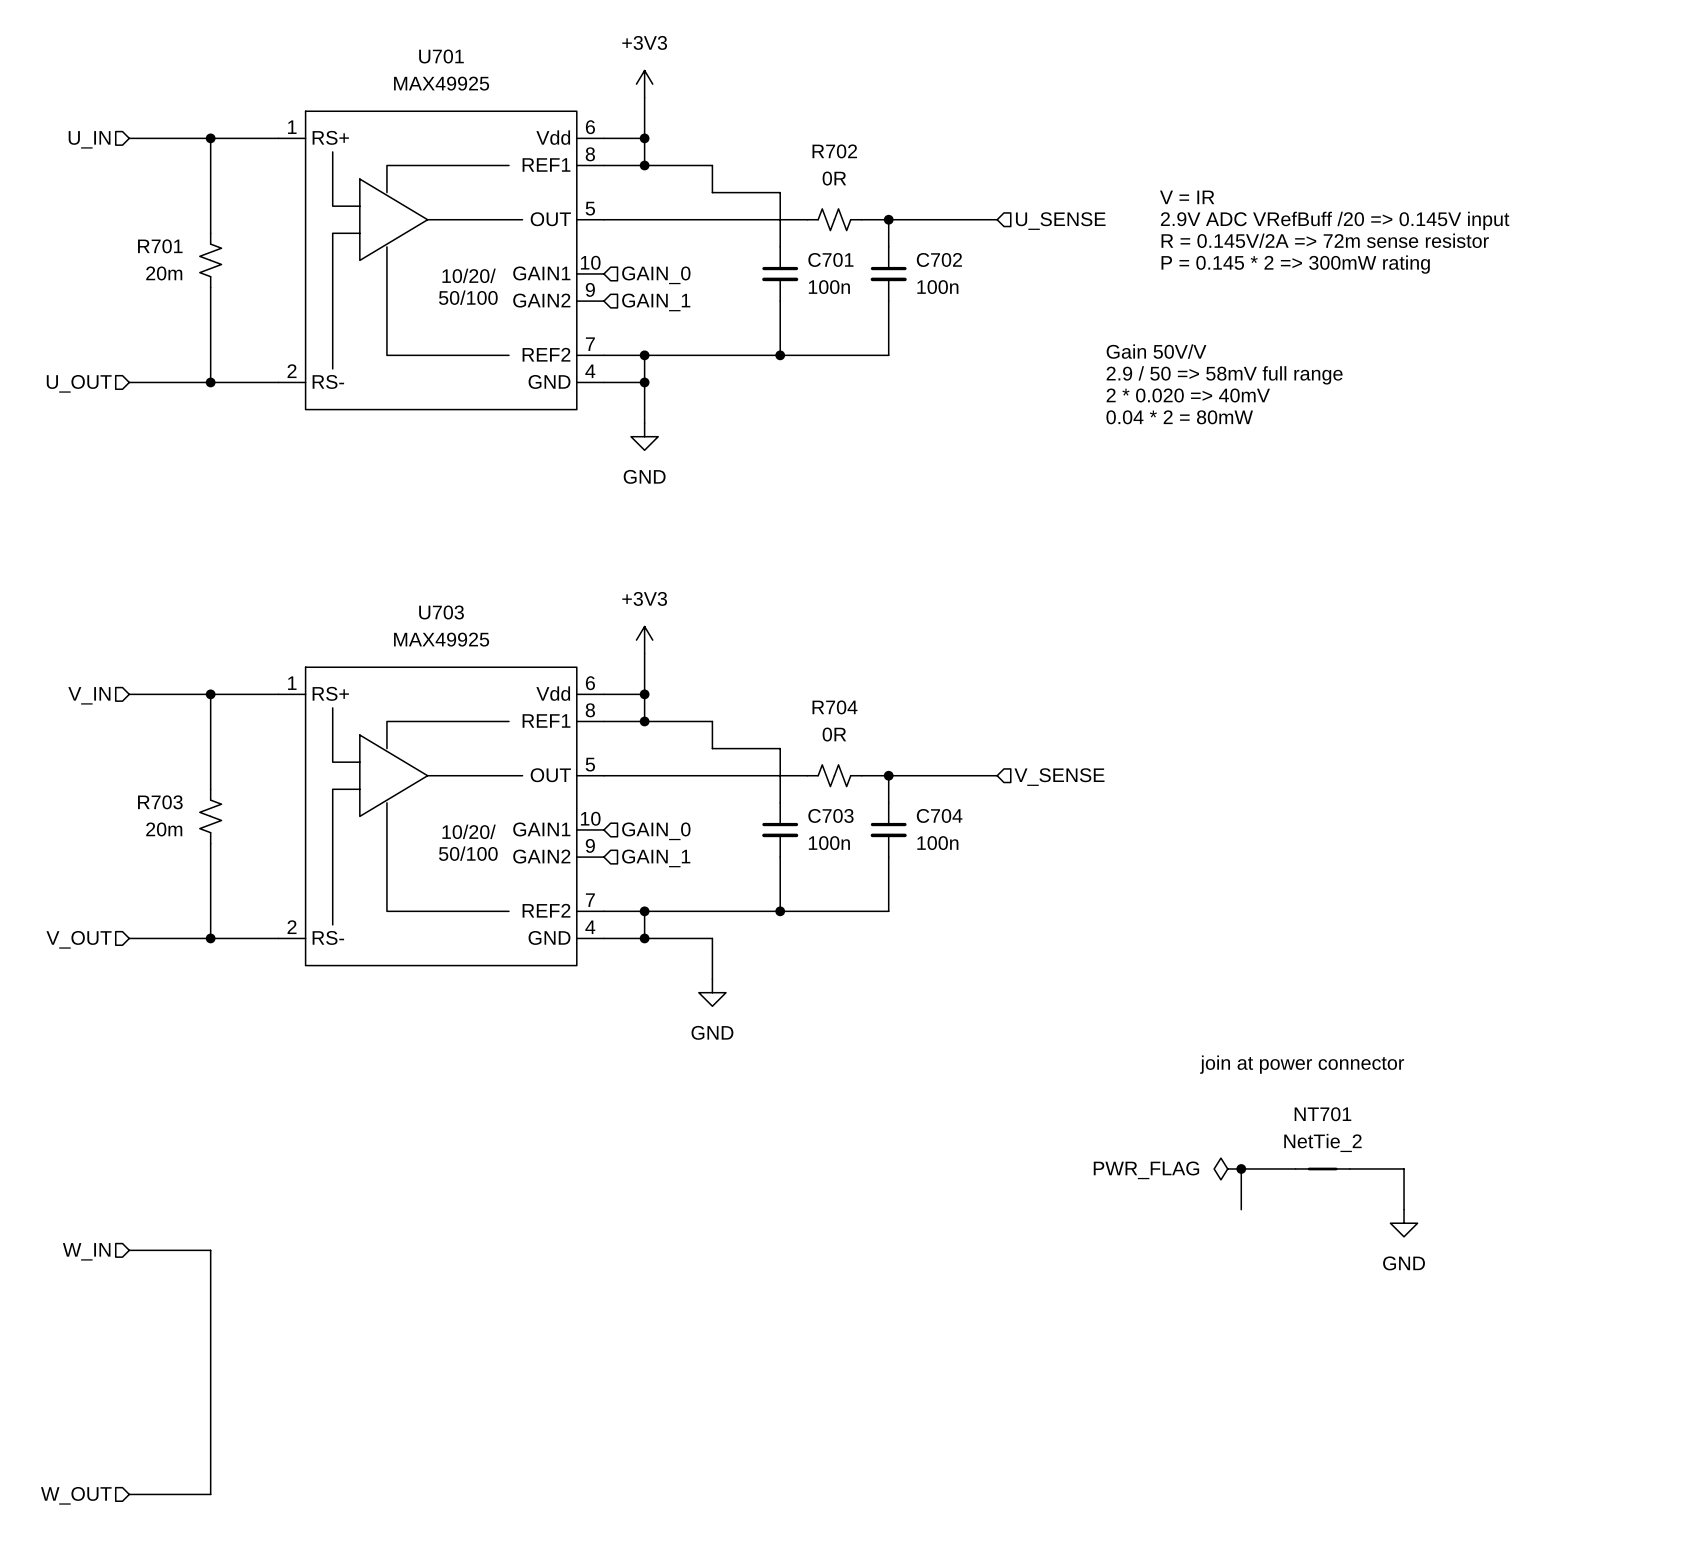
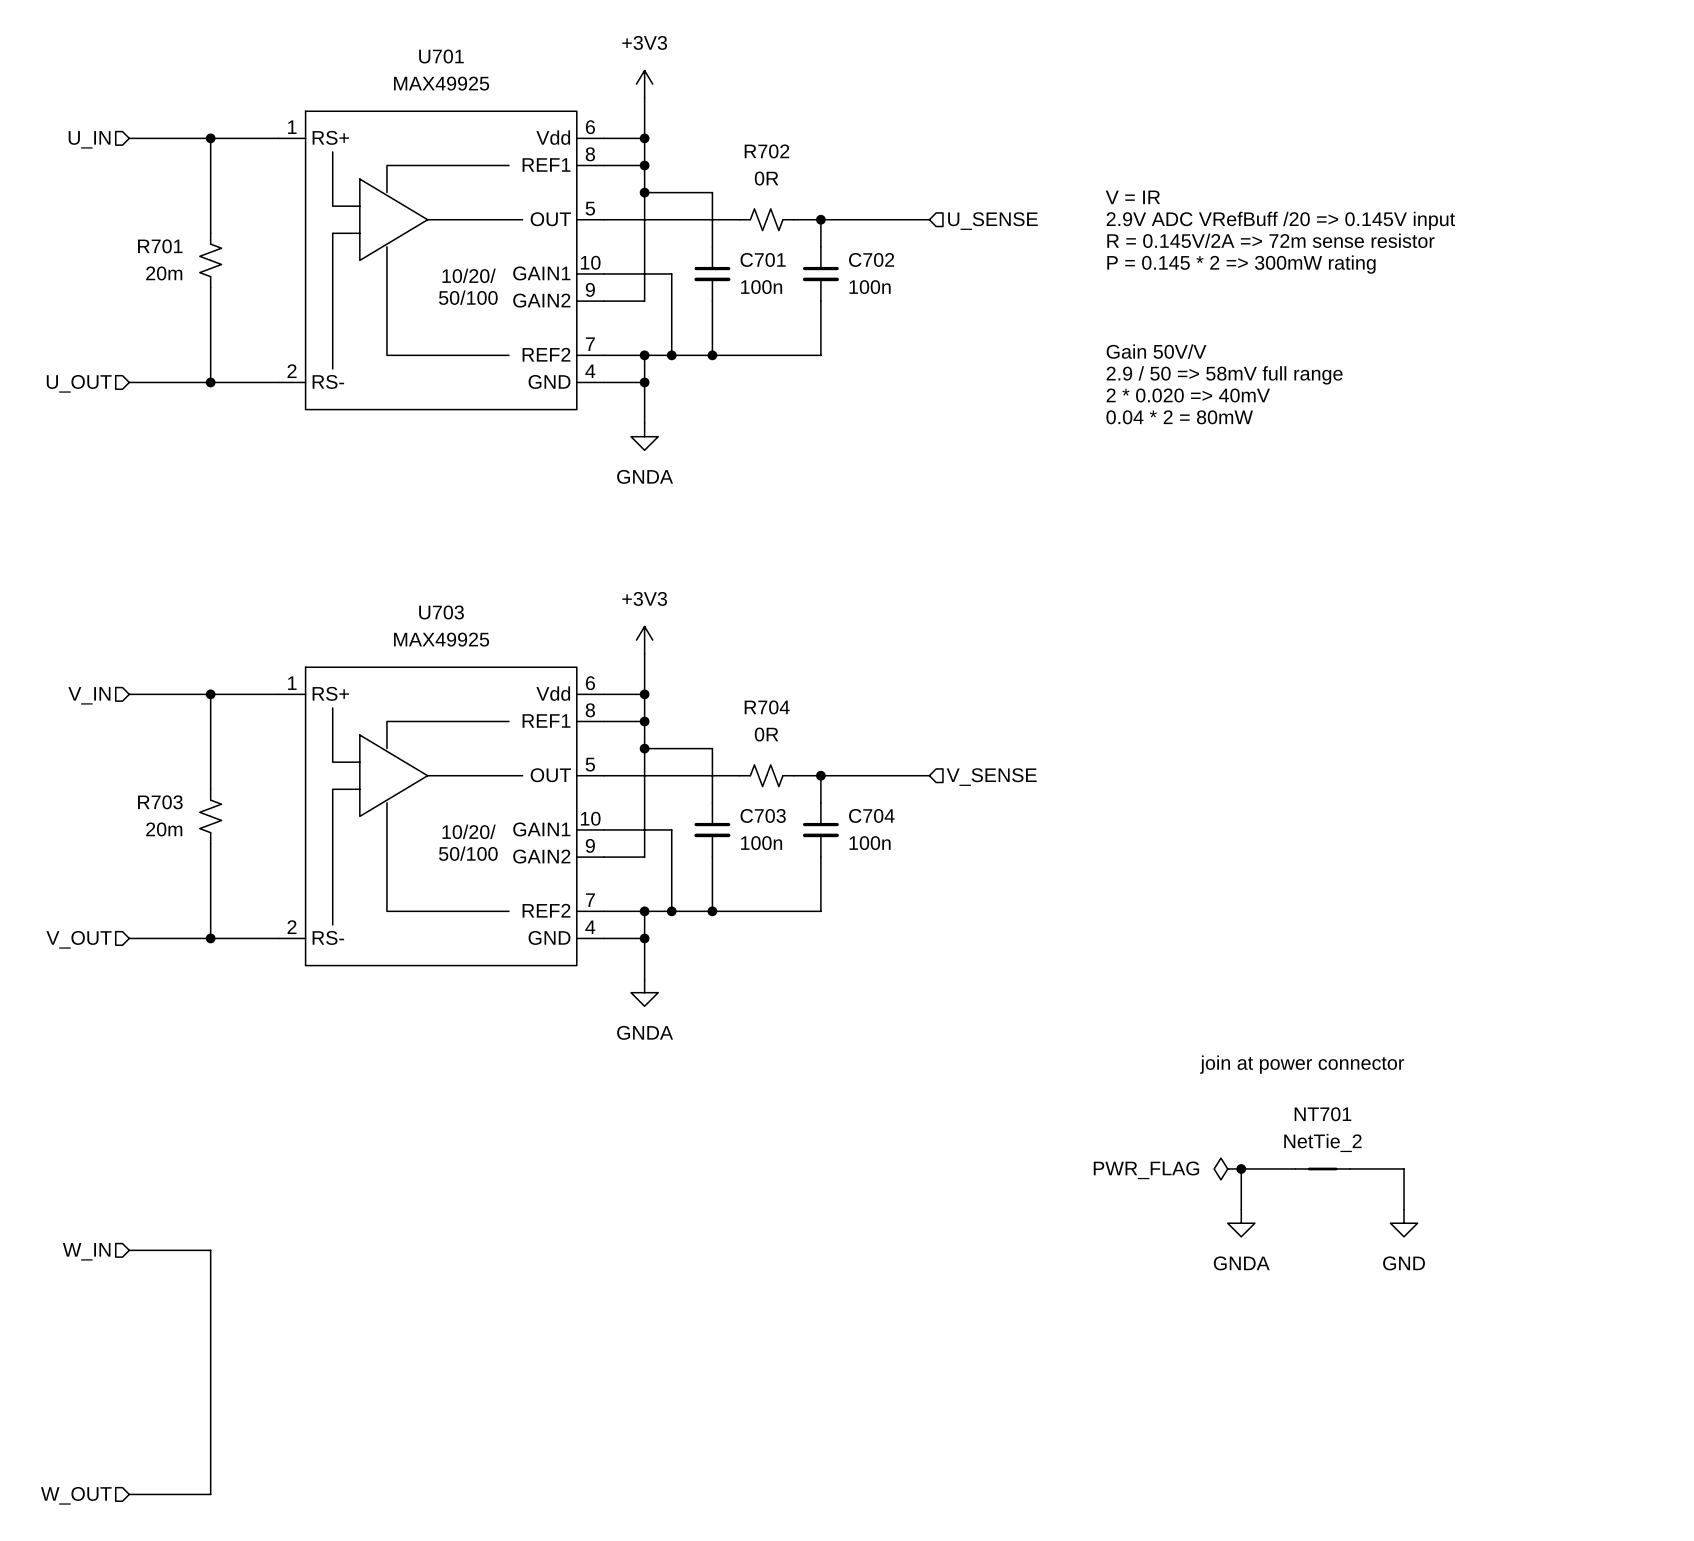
wire: (644, 165) (712, 165) (712, 192) (780, 192) (780, 246) -> (644, 165) (644, 301) (603, 301)
wire: none -> (644, 192) (712, 192) (712, 246)
junction: none -> (644, 192)
text position: V = IR (1187, 197) -> V = IR (1132, 197)
junction: none -> (820, 219)
R702 position: (834, 219) -> (766, 219)
wire: (888, 219) (888, 246) -> (820, 219) (820, 246)
junction: (888, 219) -> none
wire: (929, 219) (997, 219) -> none
text position: 2.9V ADC VRefBuff /20 => 0.145V input (1335, 220) -> 2.9V ADC VRefBuff /20 => 0.145V input (1280, 220)
hierarchical label position: U_SENSE (1060, 221) -> U_SENSE (992, 221)
text position: R = 0.145V/2A => 72m sense resistor (1325, 240) -> R = 0.145V/2A => 72m sense resistor (1270, 240)
text position: P = 0.145 * 2 => 300mW rating (1295, 264) -> P = 0.145 * 2 => 300mW rating (1241, 264)
wire: none -> (603, 273) (671, 273) (671, 355)
C701 position: (780, 273) -> (712, 273)
C702 position: (888, 273) -> (820, 273)
hierarchical label: GAIN_0 (656, 275) -> none
wire: (780, 301) (780, 355) -> (712, 301) (712, 355)
wire: (888, 301) (888, 355) (820, 355) -> (820, 301) (820, 355)
hierarchical label: GAIN_1 (656, 302) -> none
junction: none -> (671, 355)
junction: none -> (712, 355)
junction: (780, 355) -> none
power symbol: GND (644, 436) -> GNDA (644, 436)
wire: (644, 721) (712, 721) (712, 748) (780, 748) (780, 802) -> (644, 721) (644, 857) (603, 857)
wire: none -> (644, 748) (712, 748) (712, 802)
junction: none -> (644, 748)
junction: none -> (820, 775)
R704 position: (834, 775) -> (766, 775)
wire: (888, 775) (888, 802) -> (820, 775) (820, 802)
junction: (888, 775) -> none
wire: (929, 775) (997, 775) -> none
hierarchical label position: V_SENSE (1059, 777) -> V_SENSE (991, 777)
wire: none -> (603, 829) (671, 829) (671, 911)
C703 position: (780, 829) -> (712, 829)
C704 position: (888, 829) -> (820, 829)
hierarchical label: GAIN_0 (656, 831) -> none
wire: (780, 857) (780, 911) -> (712, 857) (712, 911)
wire: (888, 857) (888, 911) (820, 911) -> (820, 857) (820, 911)
hierarchical label: GAIN_1 (656, 858) -> none
junction: none -> (671, 911)
junction: none -> (712, 911)
junction: (780, 911) -> none
wire: (644, 938) (712, 938) (712, 979) -> (644, 938) (644, 979)
power symbol: none -> GNDA (644, 992)
power symbol: GND (712, 992) -> none
power symbol: none -> GNDA (1241, 1223)

